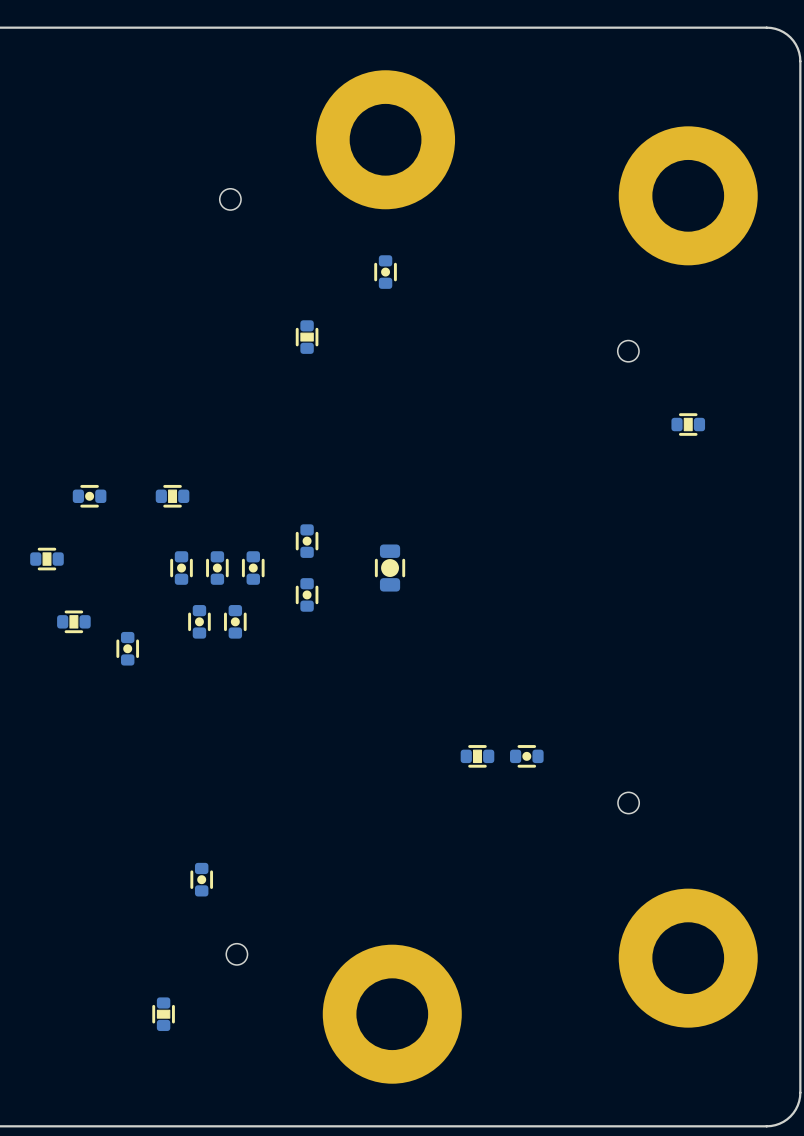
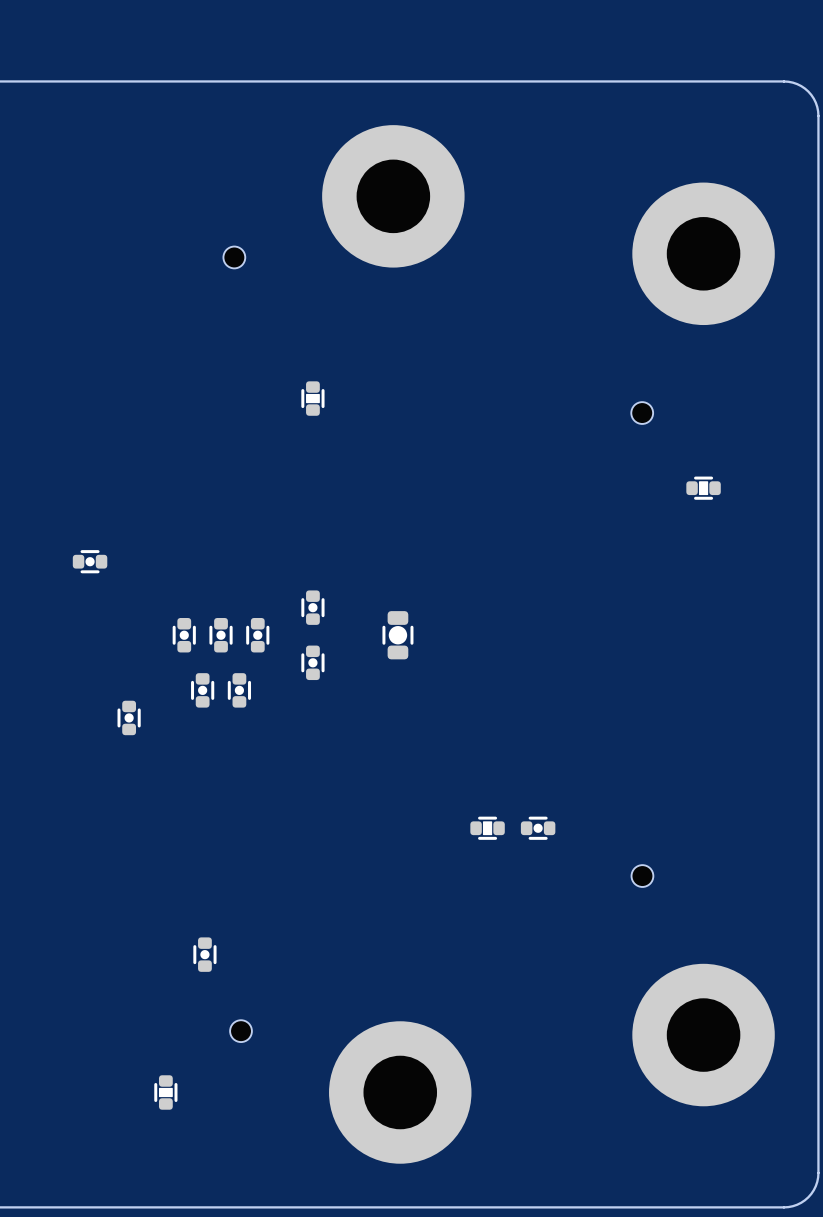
part: (385, 272) -> none
part: (172, 496) -> none
part: (46, 559) -> none
part: (73, 621) -> none

